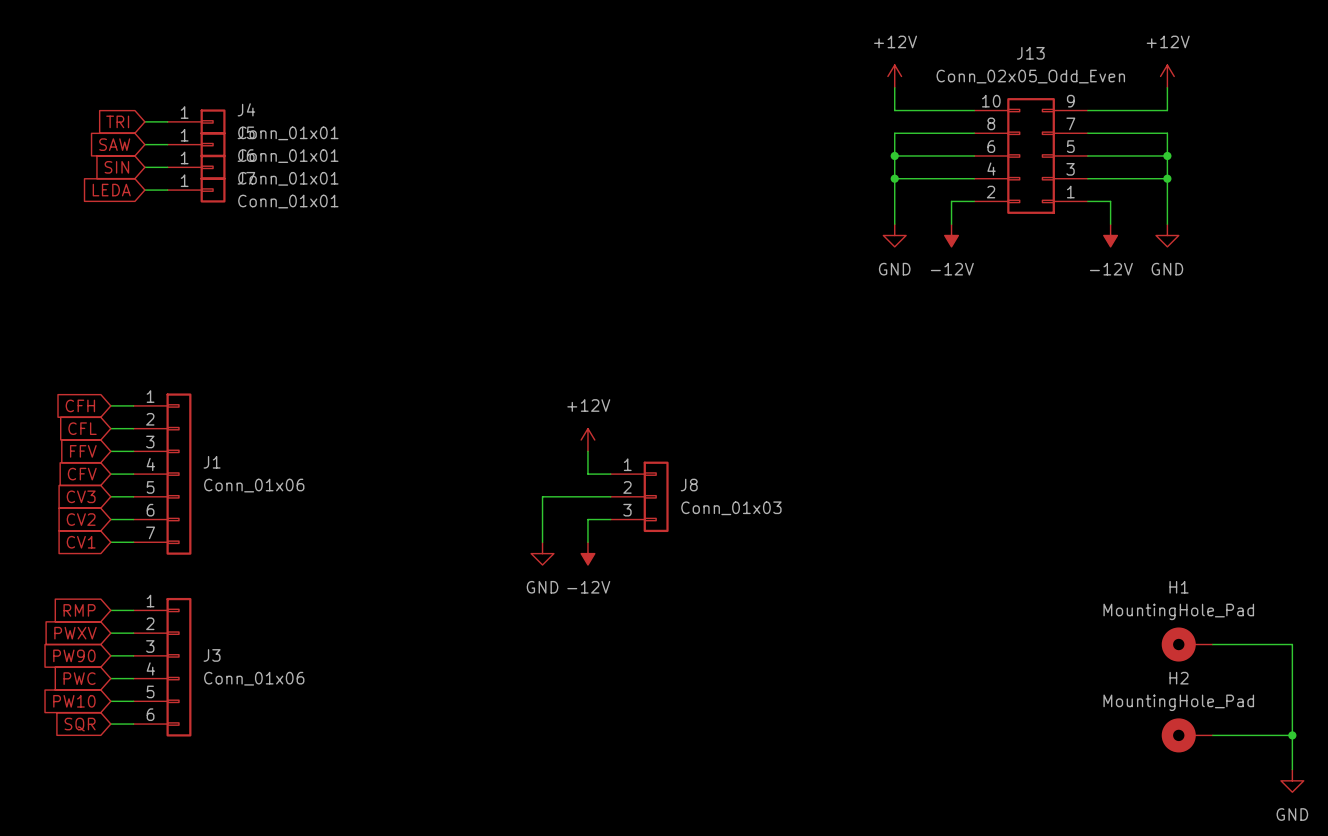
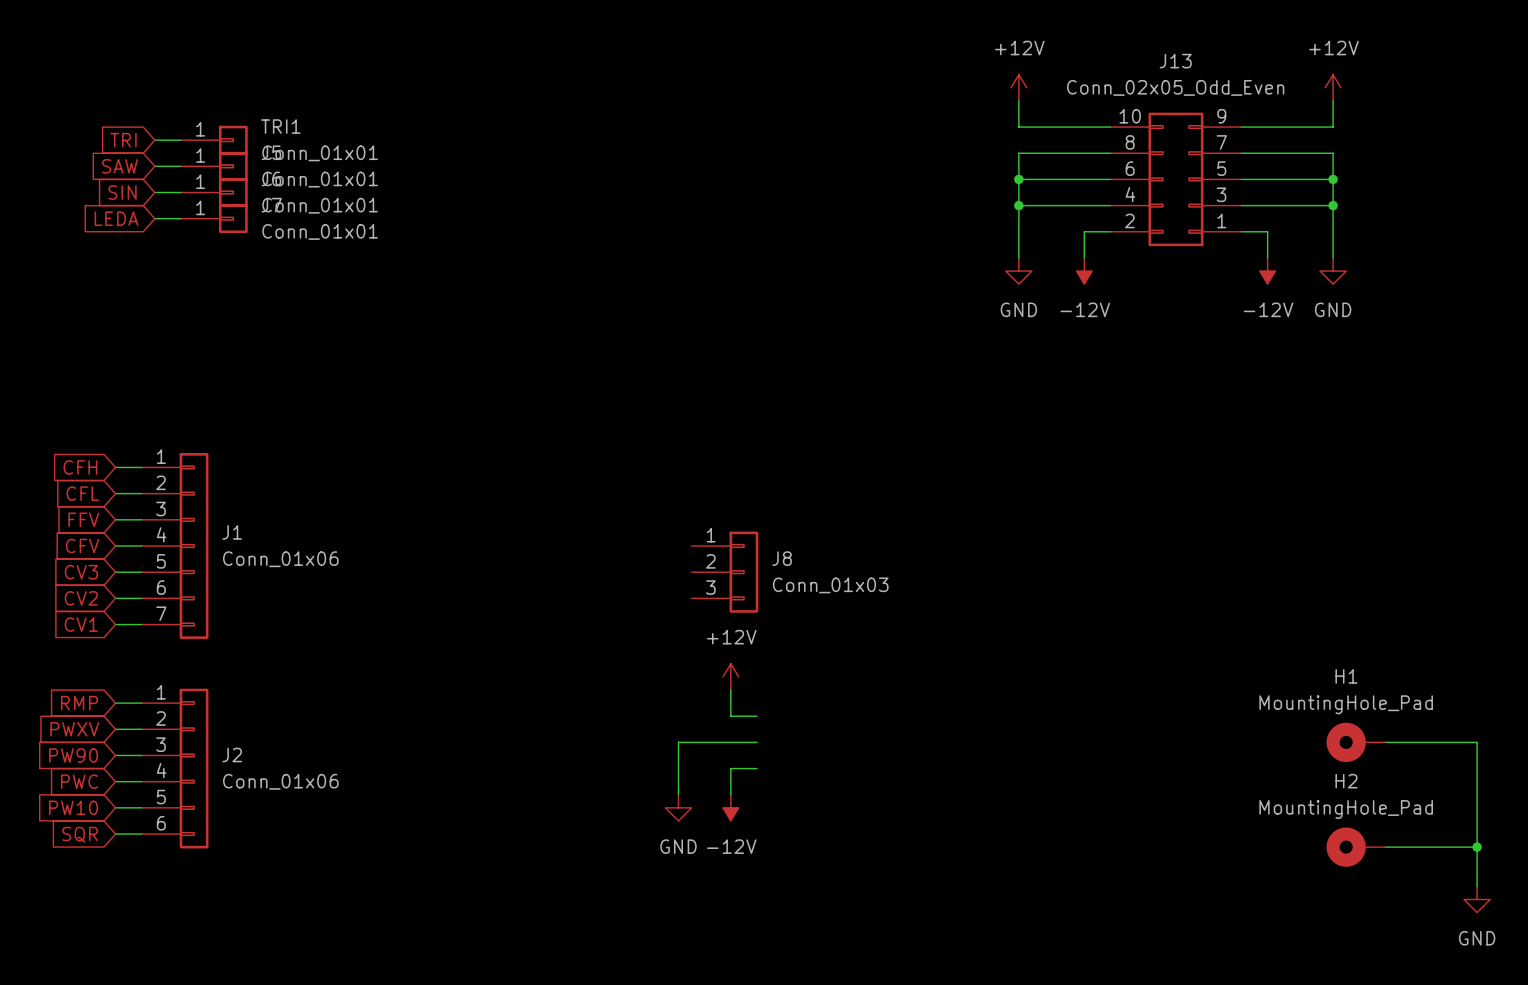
J4 name: J4 (246, 109) -> TRI1 (280, 126)
power symbol position: +12V (587, 440) -> +12V (730, 676)
wire: (587, 451) (587, 474) (610, 474) -> (730, 690) (730, 716) (757, 716)
wire: (610, 496) (542, 496) (542, 542) -> (757, 742) (678, 742) (678, 794)
wire: (610, 519) (587, 519) (587, 542) -> (757, 768) (730, 768) (730, 794)
power symbol position: GND (542, 553) -> GND (678, 807)
power symbol position: -12V (587, 553) -> -12V (730, 807)
J3 name: J3 (212, 655) -> J2 (232, 754)

